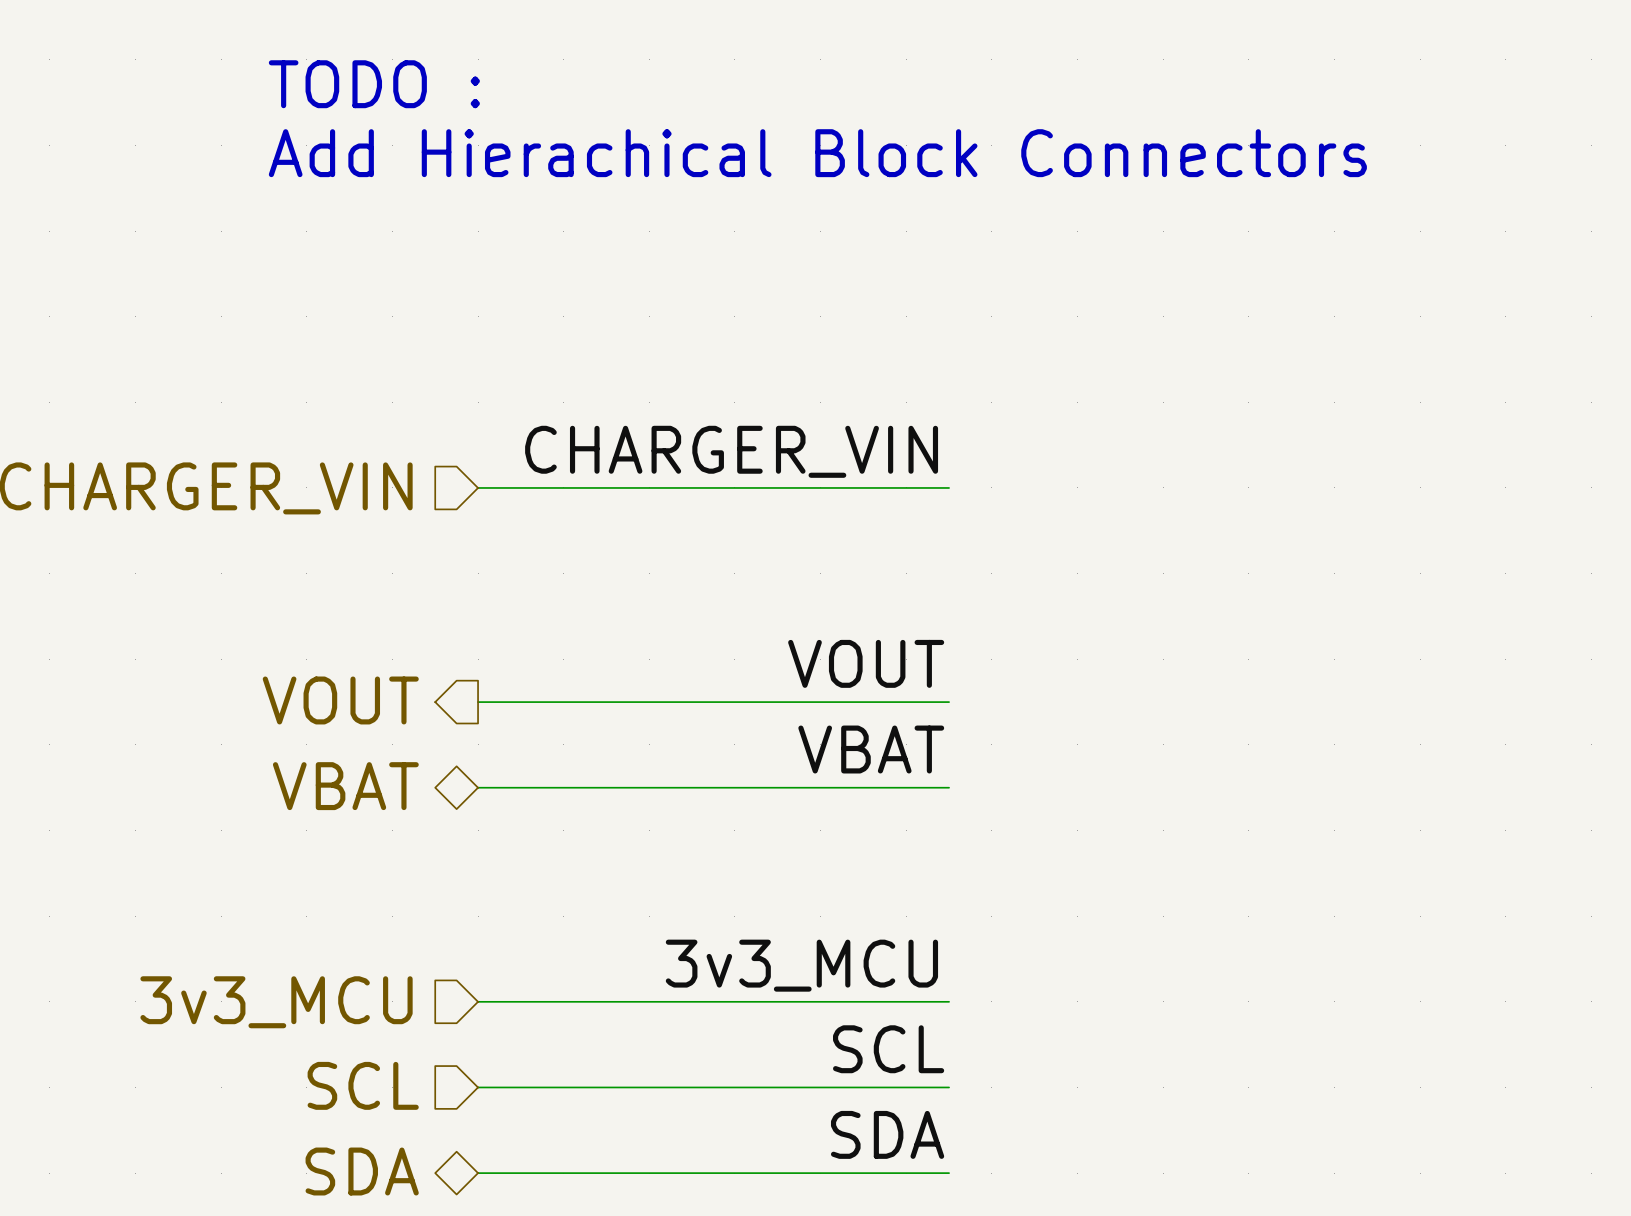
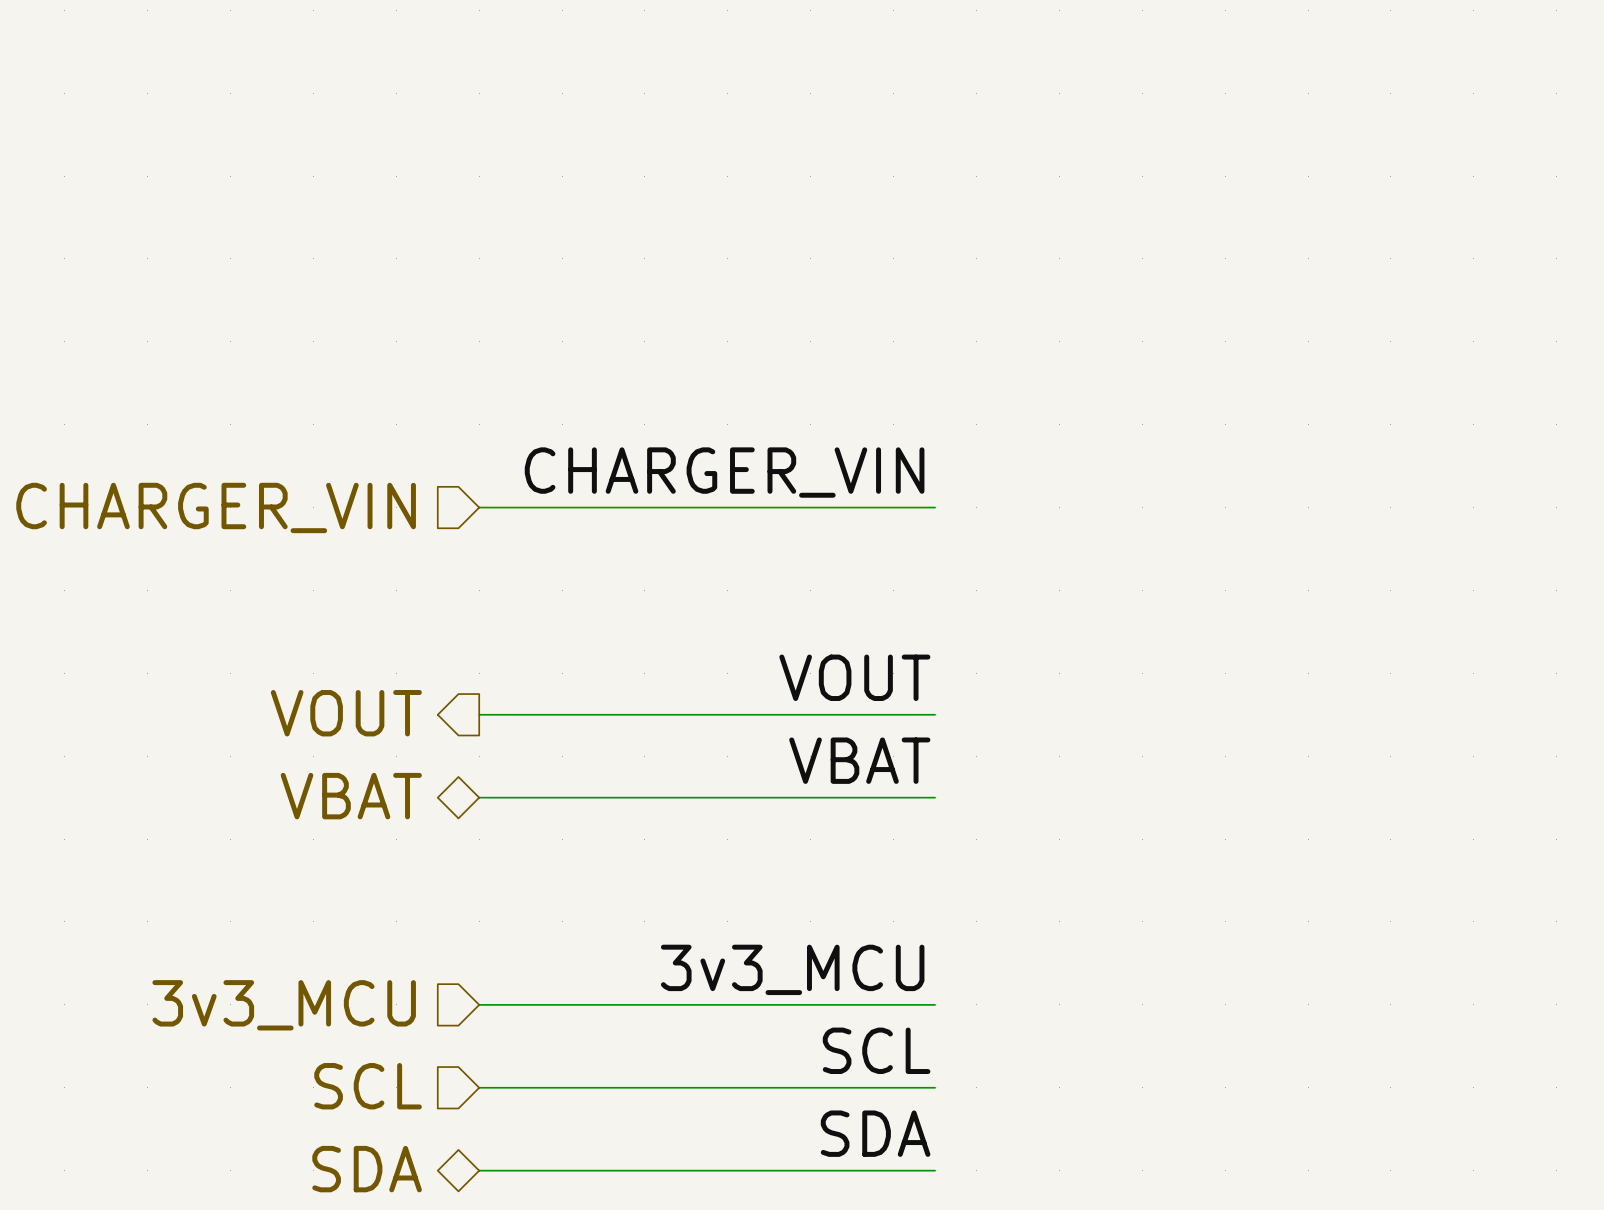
text: TODO : (374, 84) -> none
text: Add Hierachical Block Connectors (817, 153) -> none

